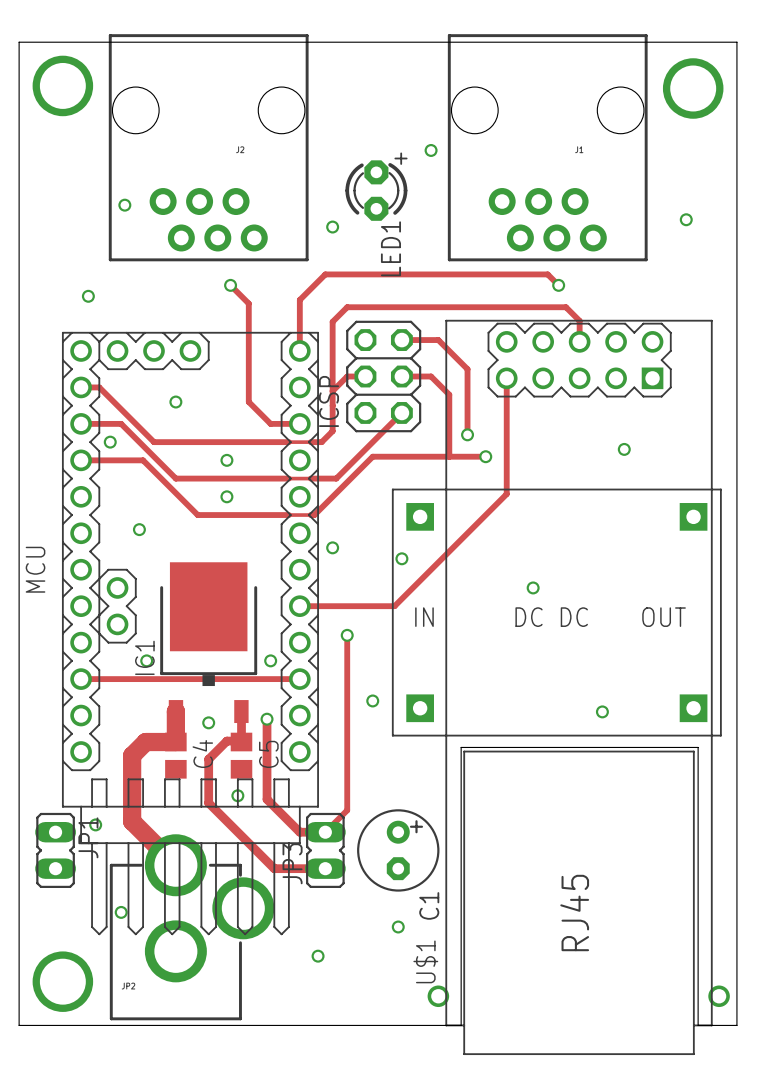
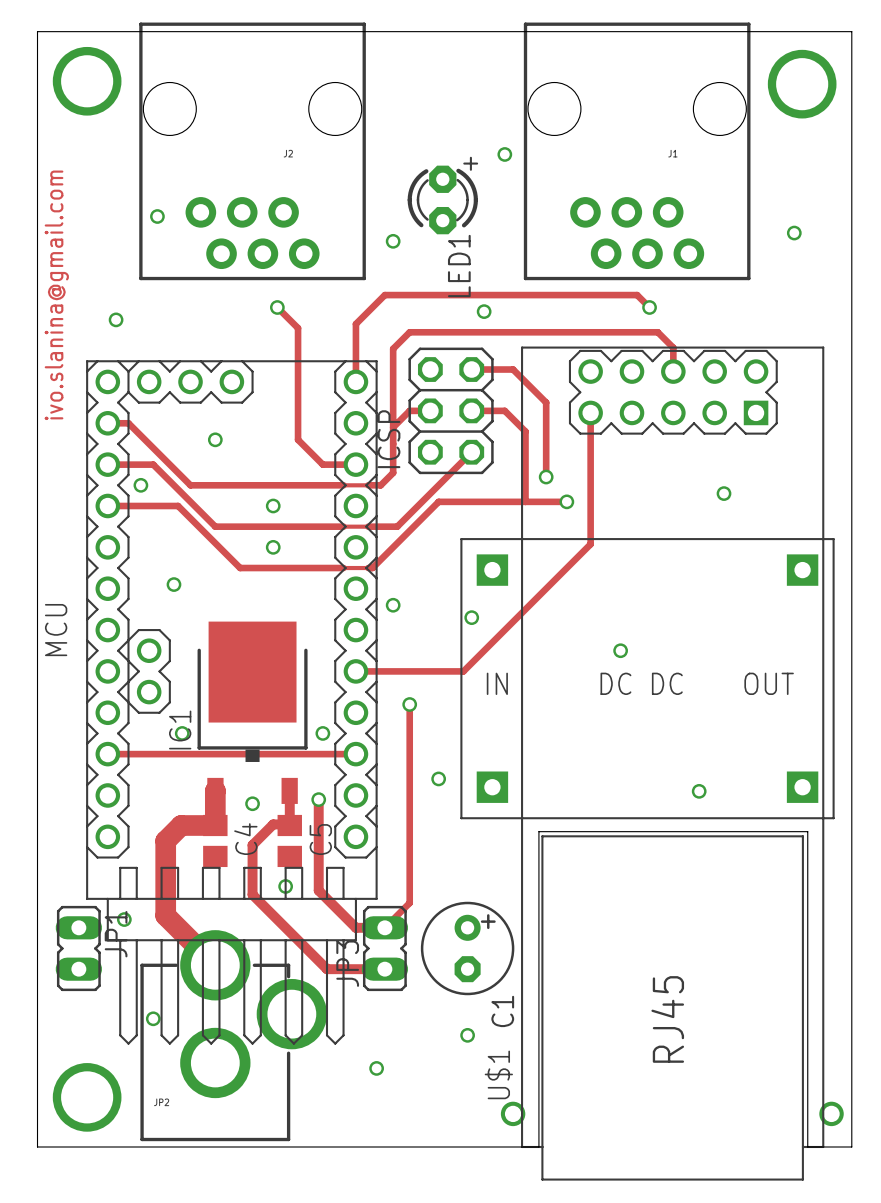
text: none -> ivo.slanina@gmail.com (56, 295)
via: none -> (484, 311)

